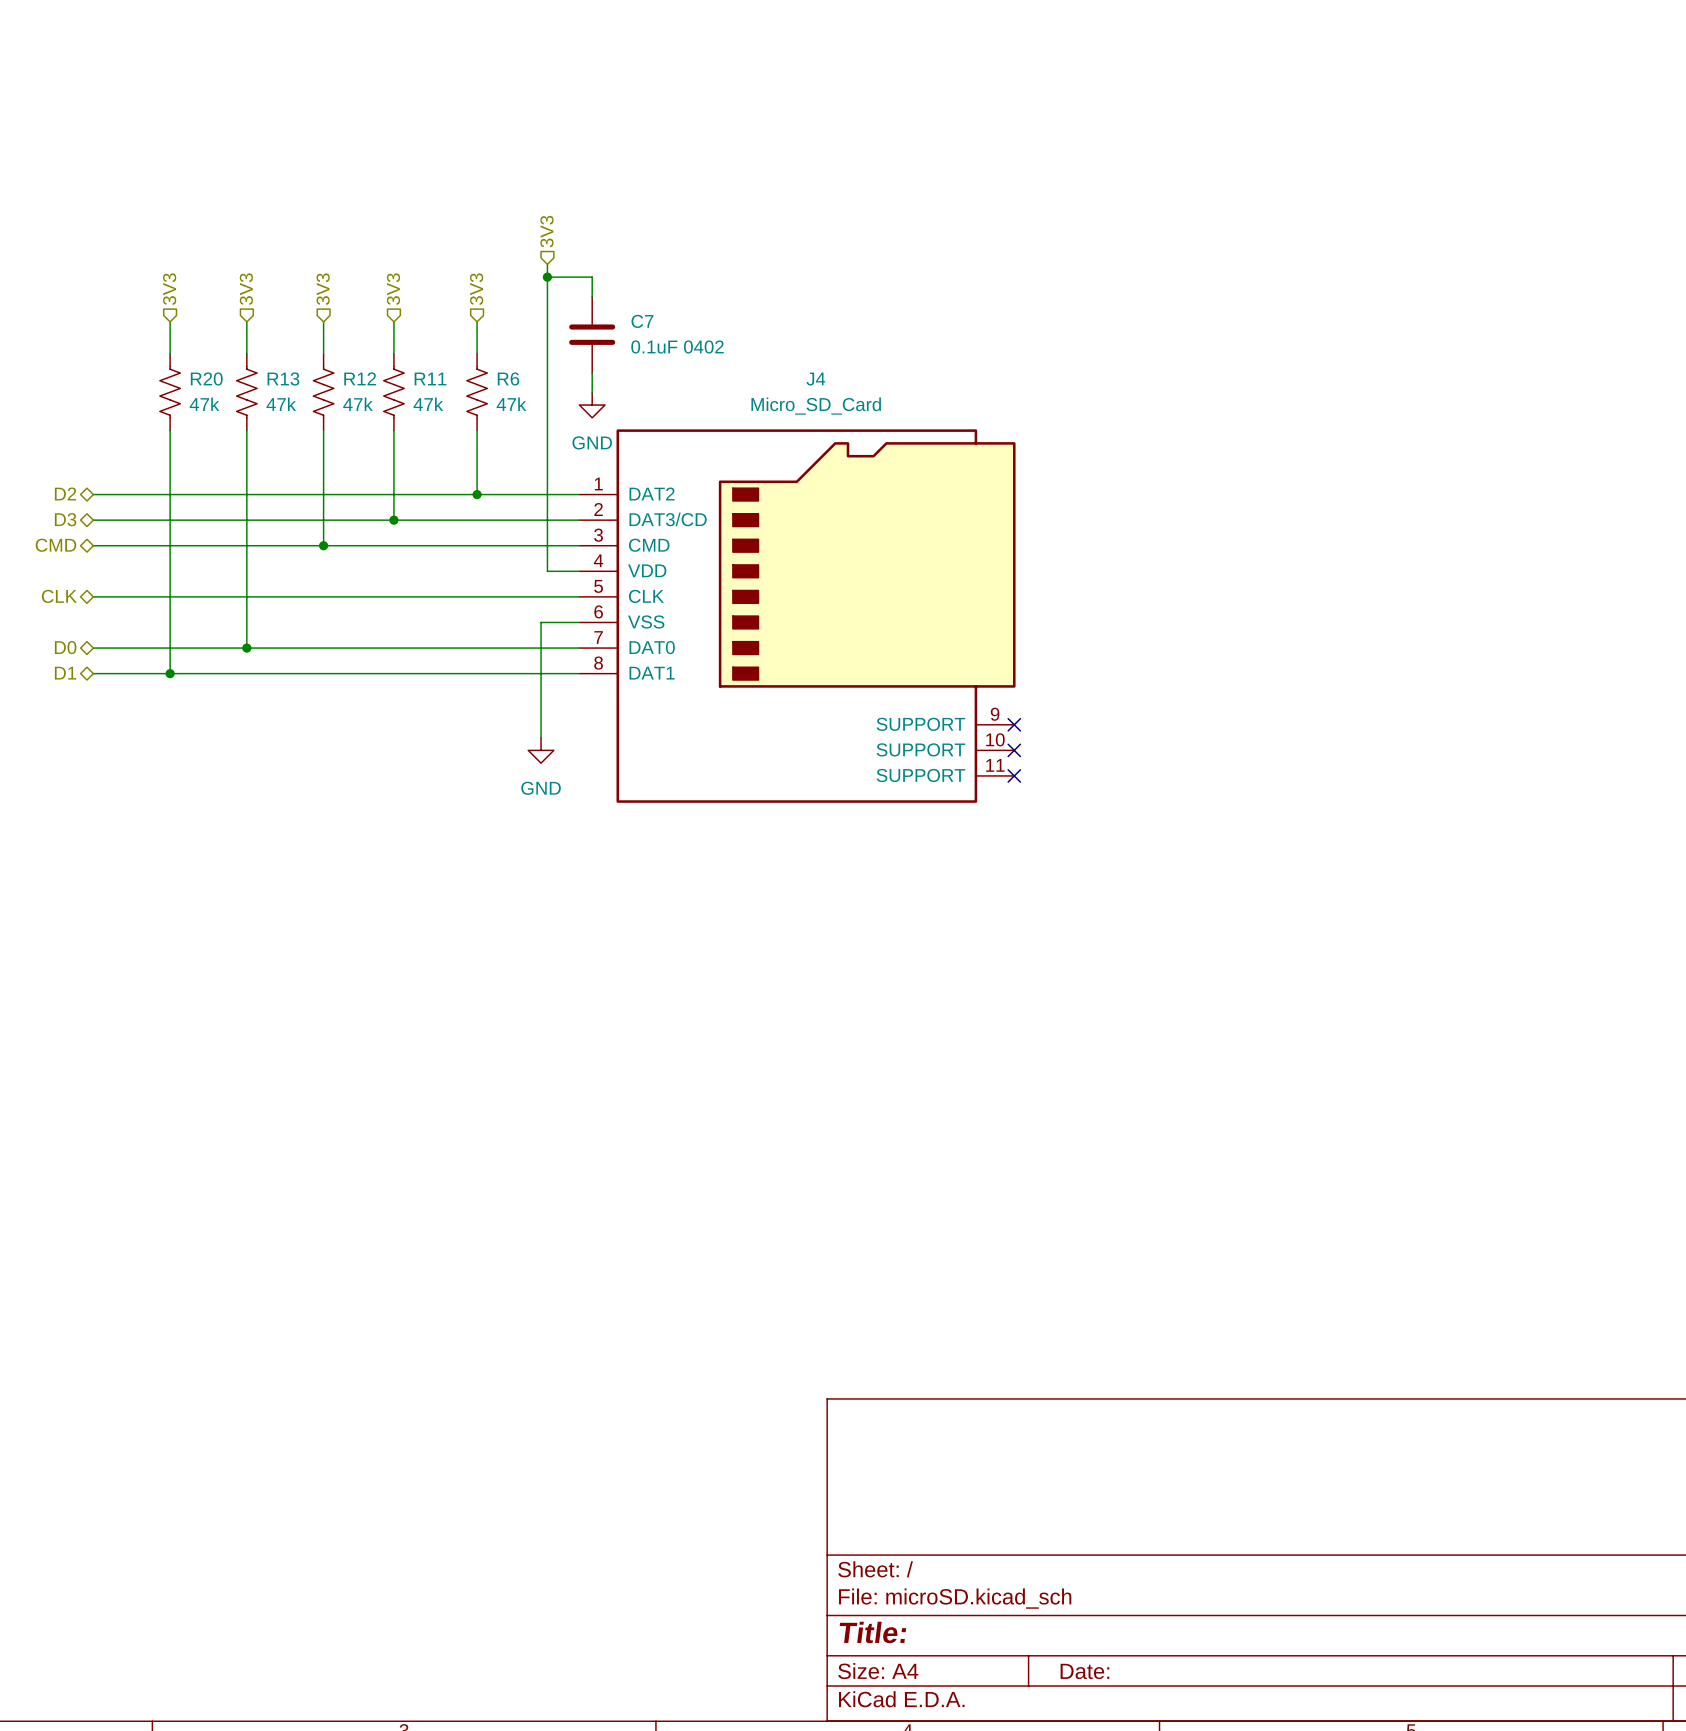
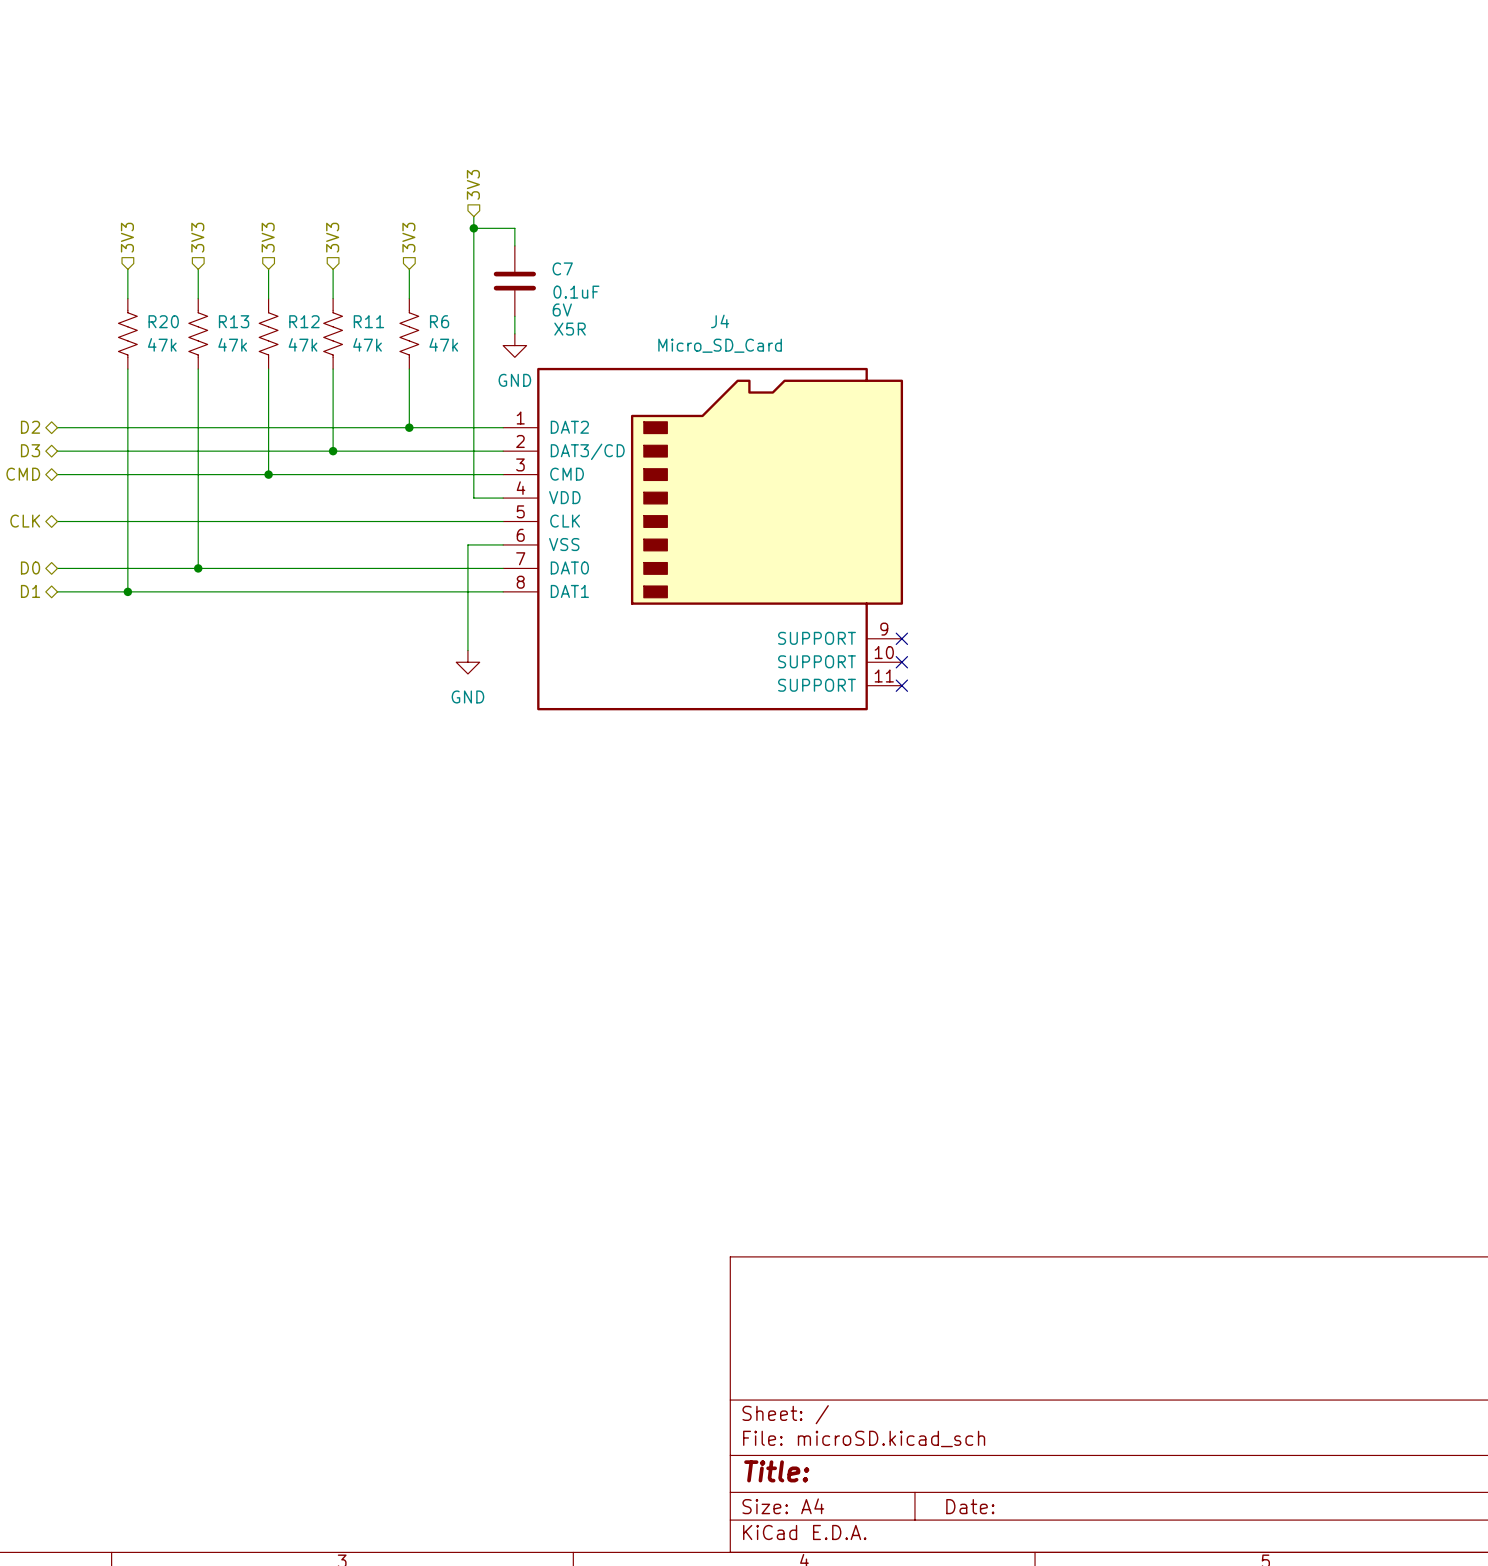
C7 value: 0.1uF 0402 (677, 346) -> 0.1uF (576, 292)
C7 text: none -> 6V (562, 309)
C7 text: none -> X5R (570, 329)

